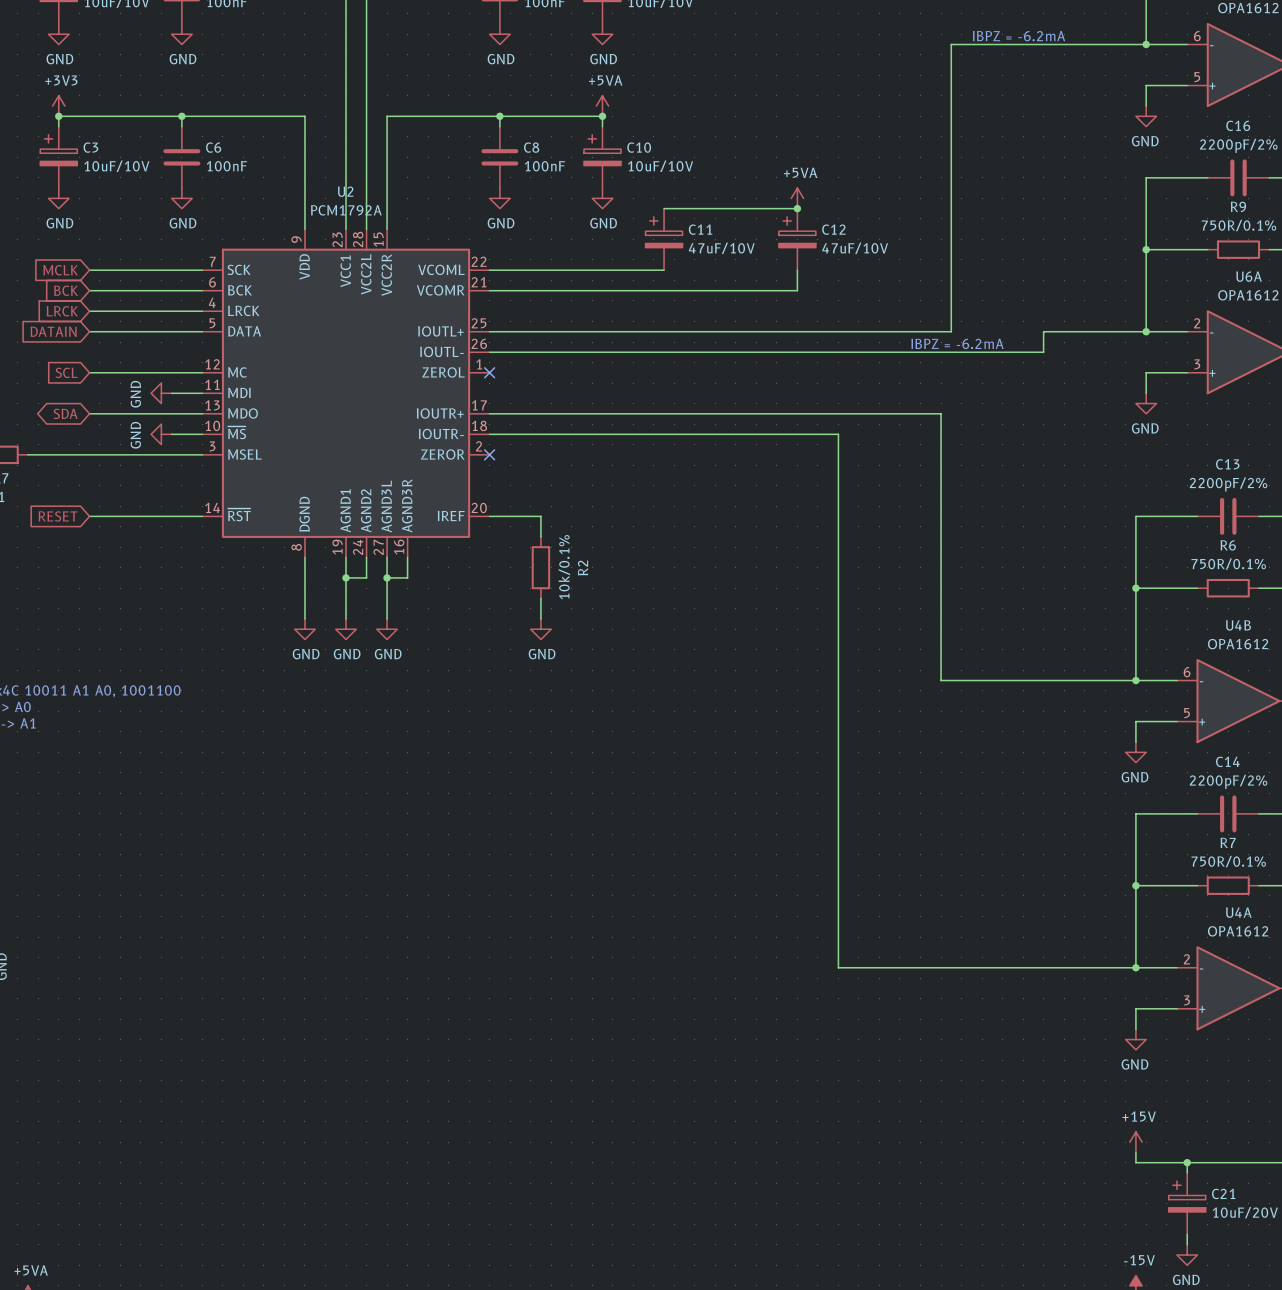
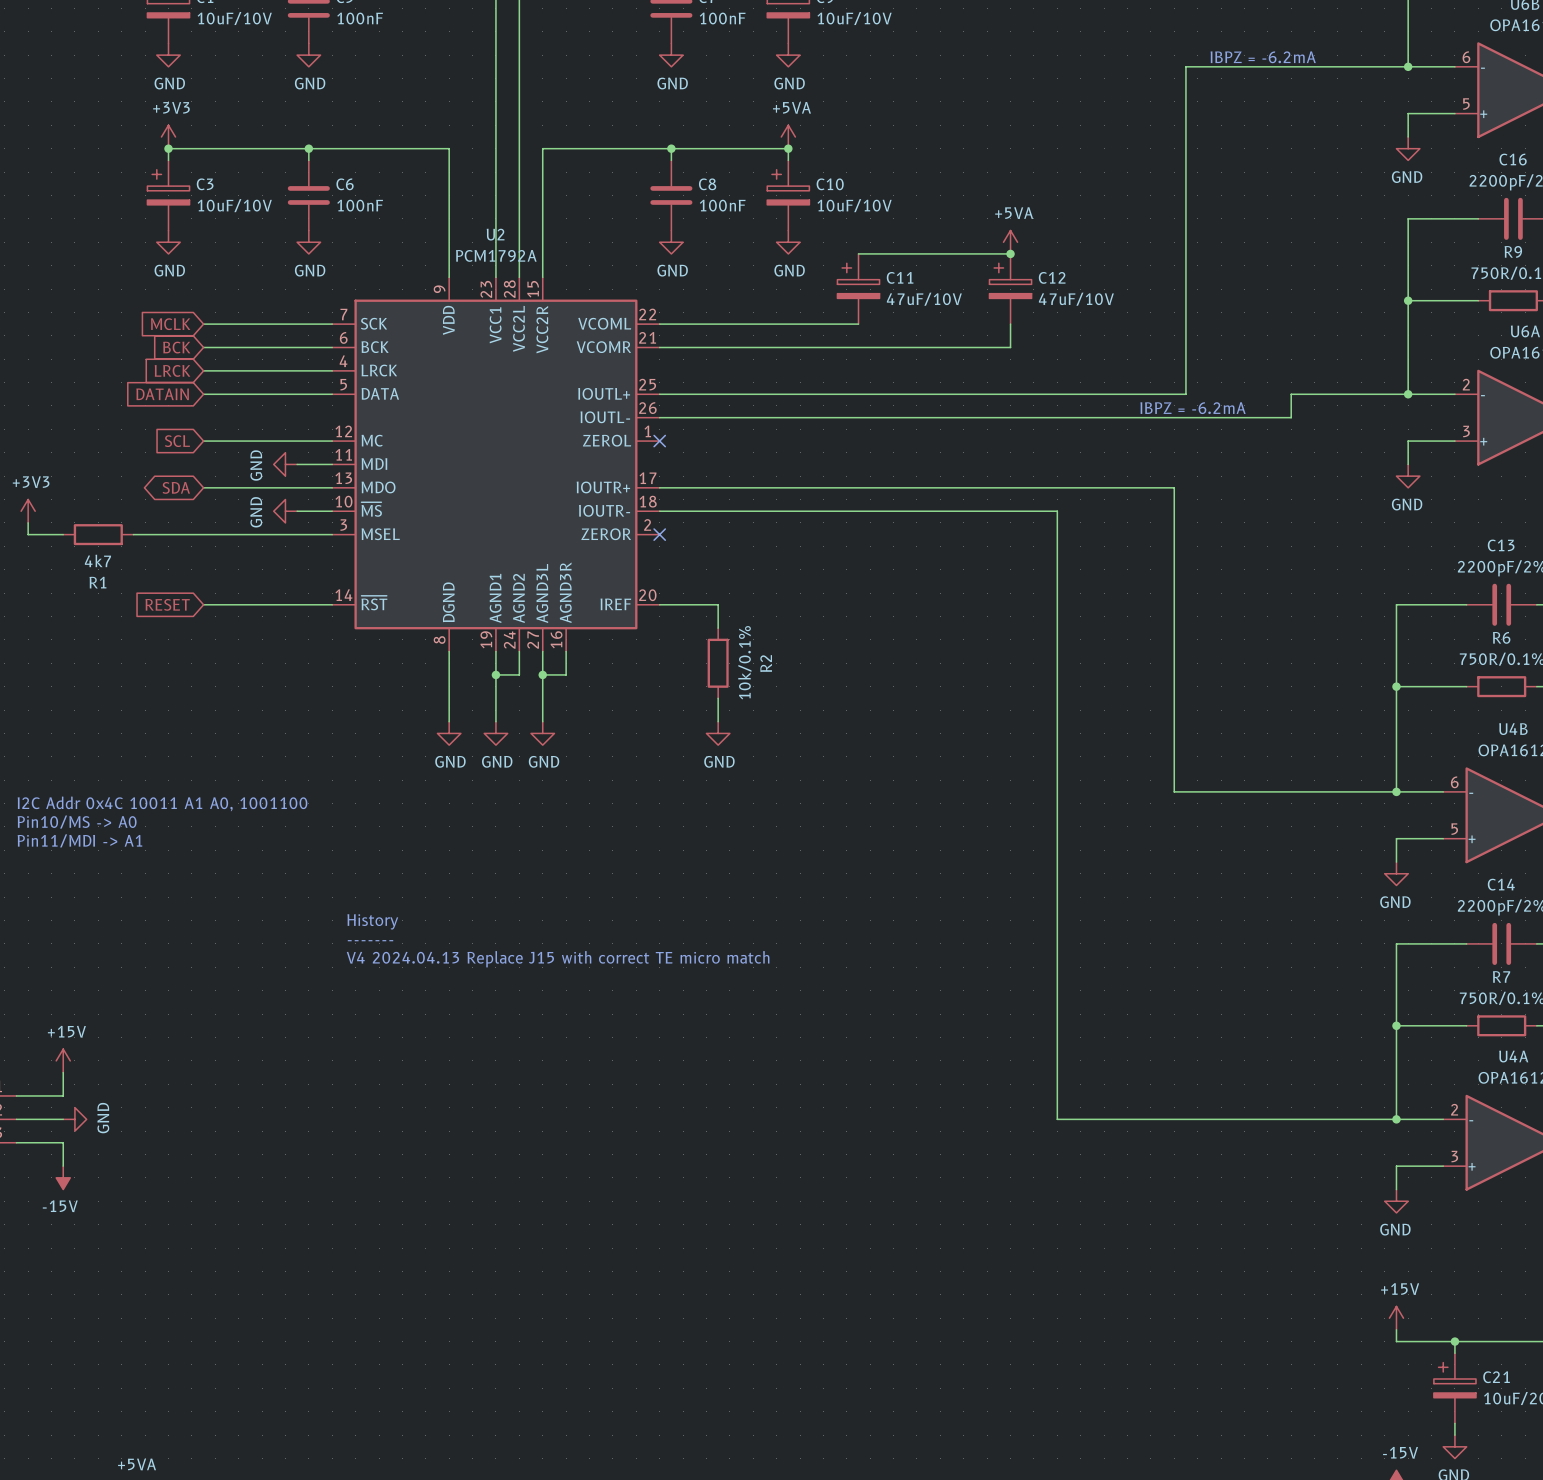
text: none -> History (372, 921)
text: none -> ------- (370, 940)
text: none -> V4 2024.04.13 Replace J15 with correct TE micro match (558, 959)

